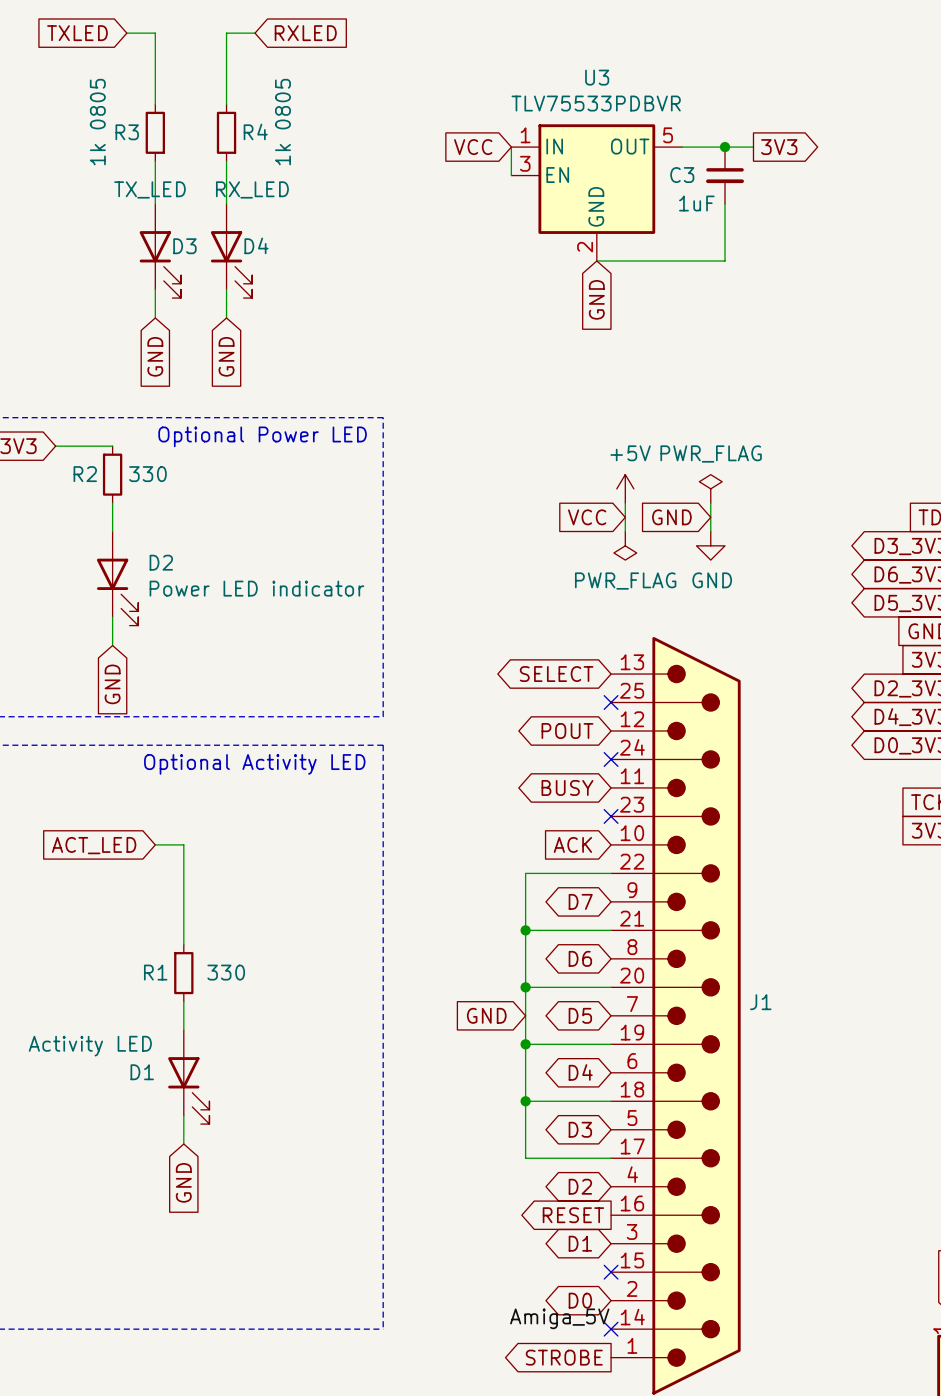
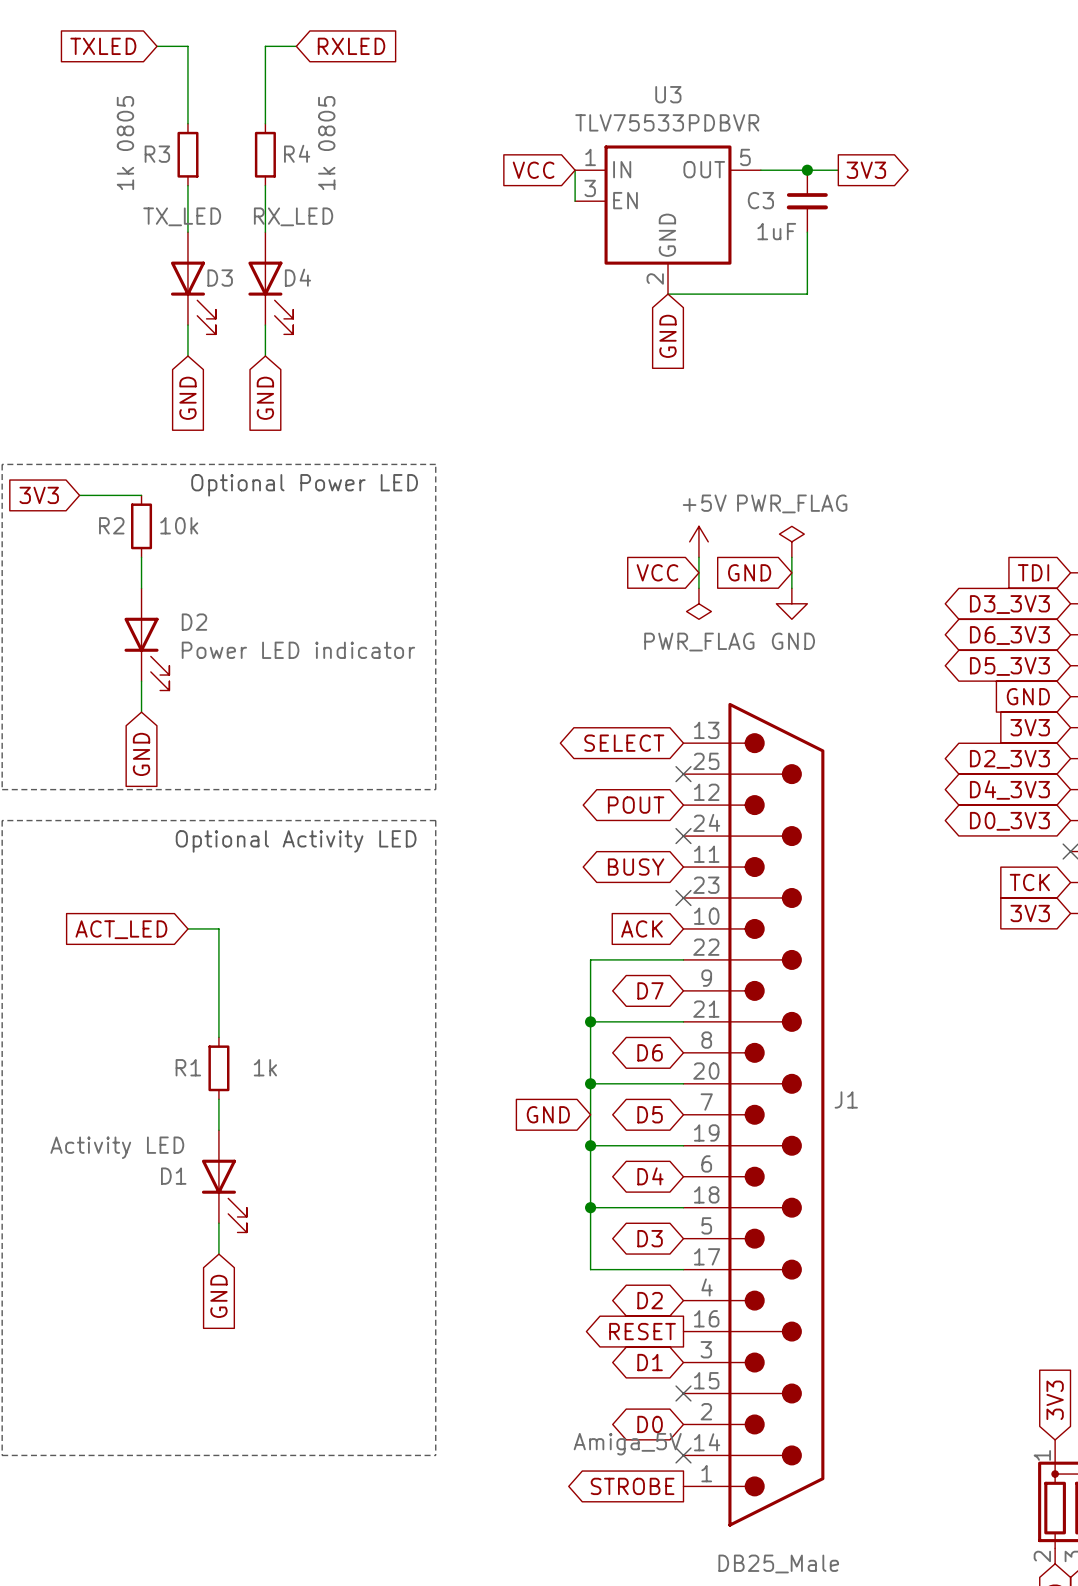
R2 value: 330 (147, 474) -> 10k (179, 525)
R1 value: 330 (226, 972) -> 1k (265, 1067)

